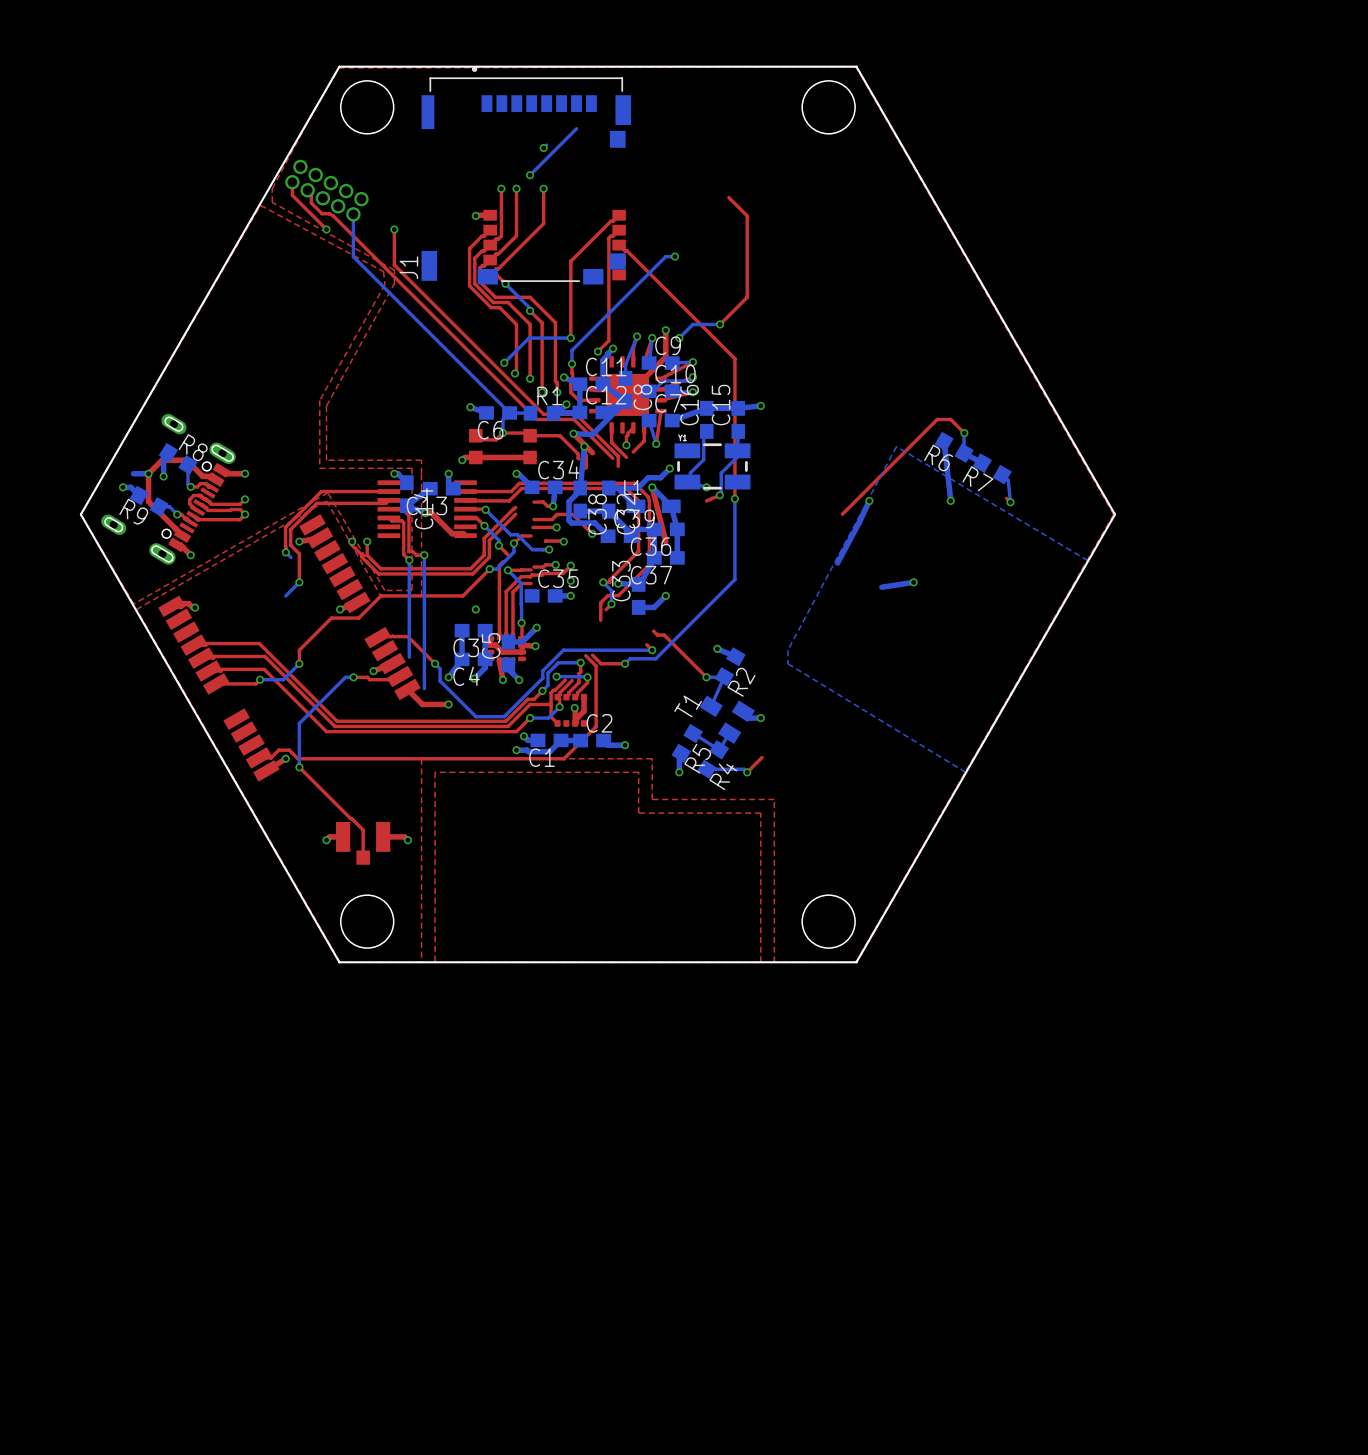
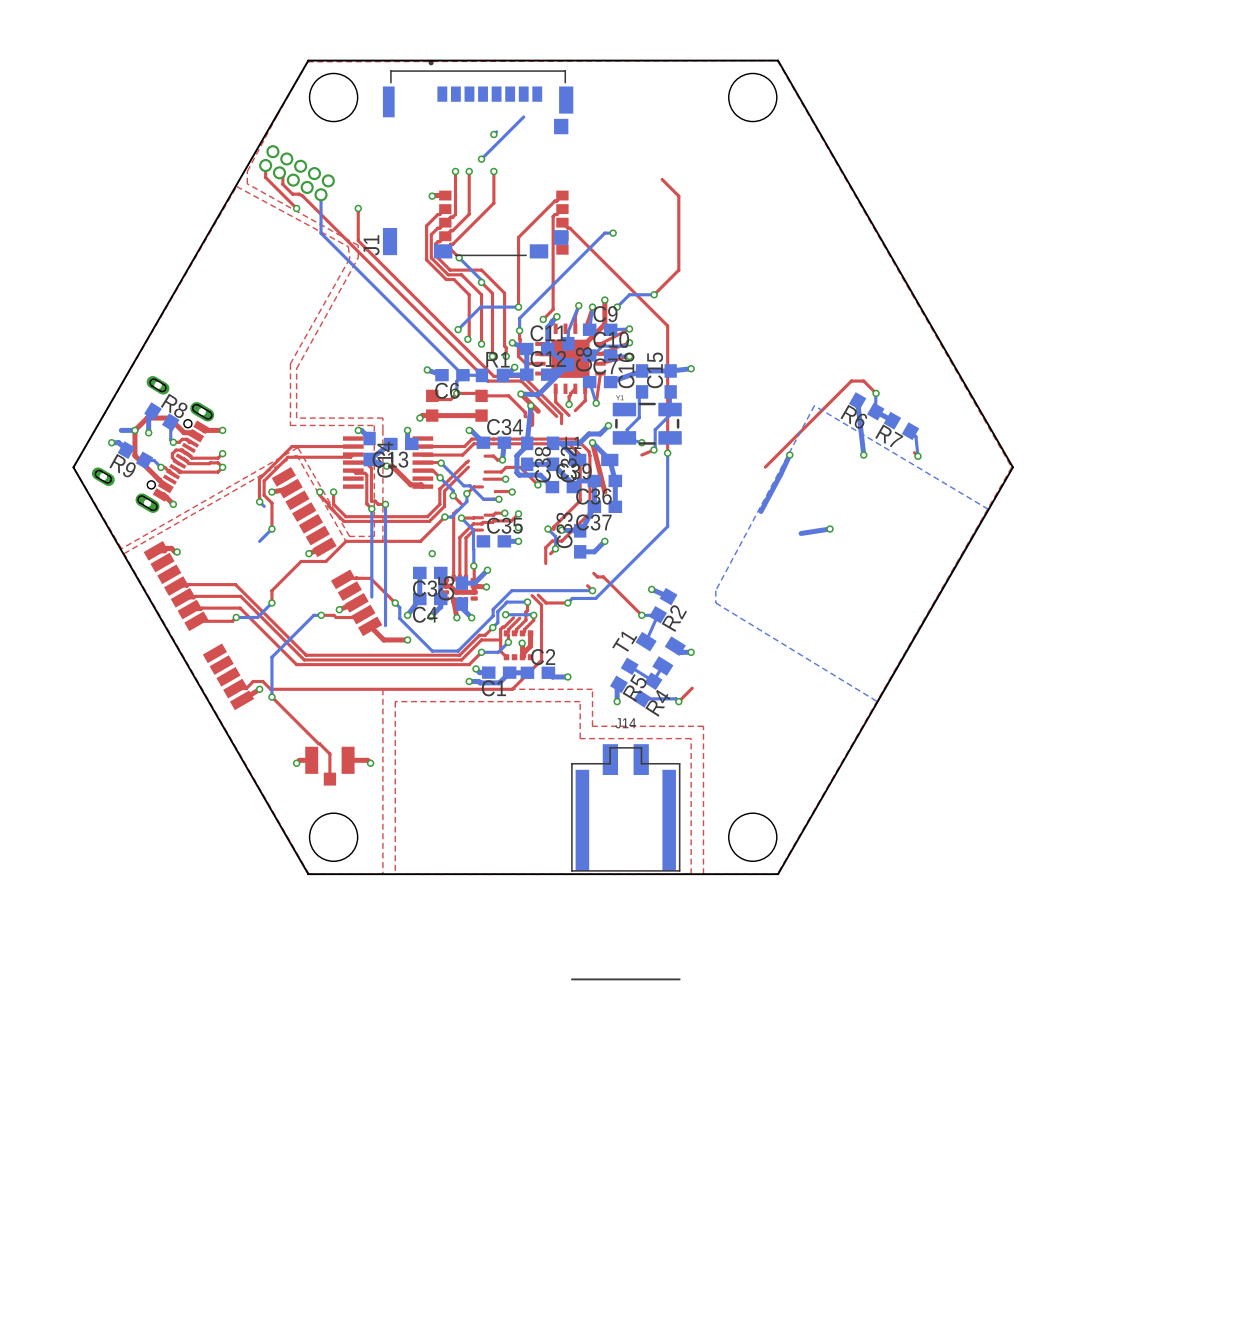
J14: none -> (625, 862)

